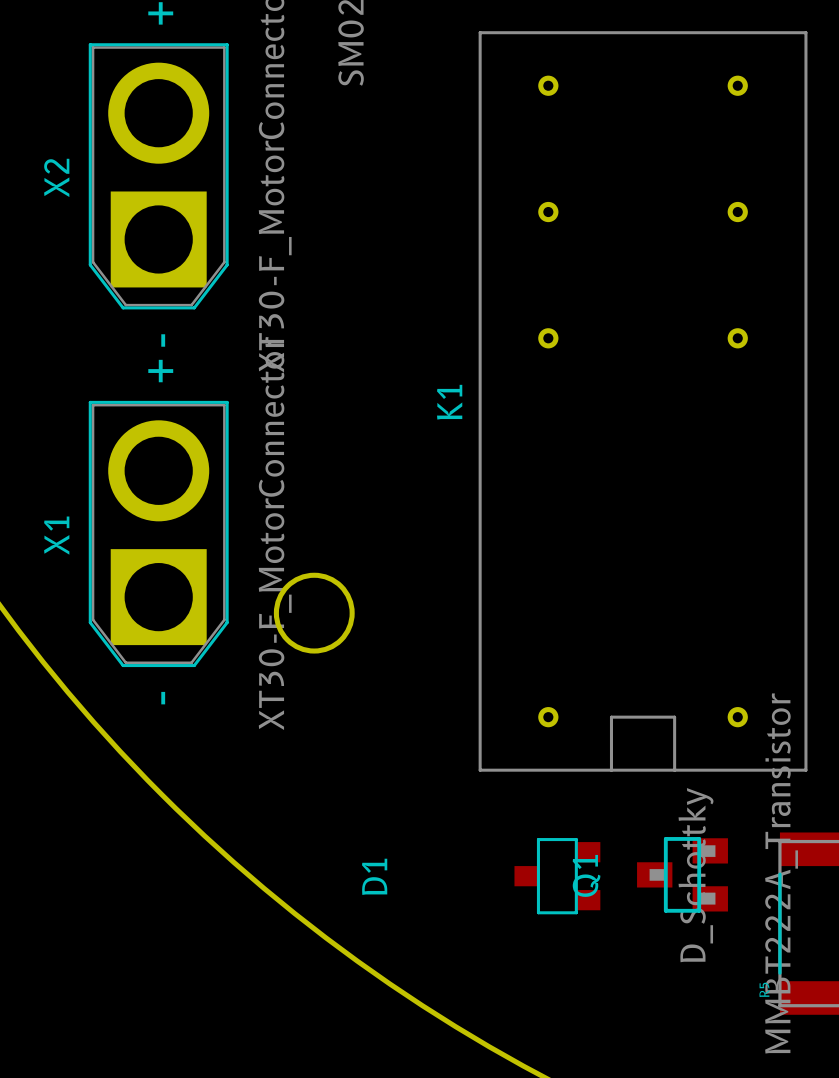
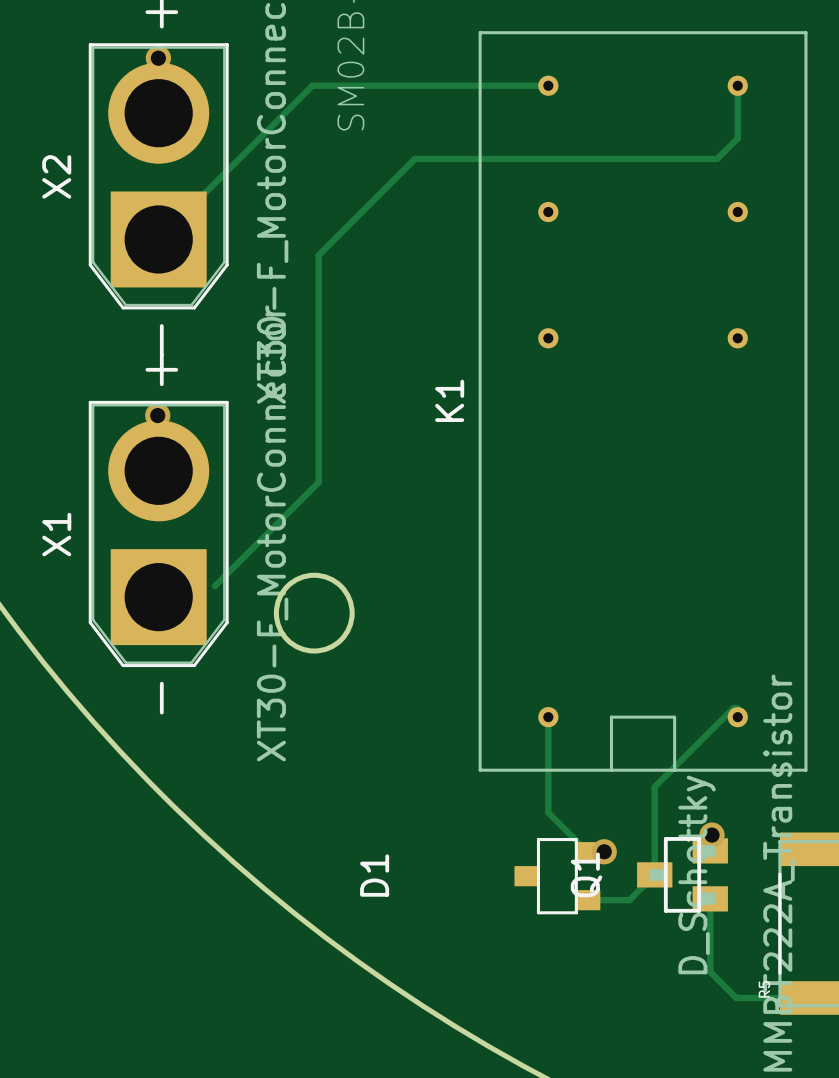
via: none -> (158, 58)
track: none -> (548, 85) (312, 85) (158, 239)
track: none -> (737, 85) (737, 138) (717, 158) (414, 158) (318, 255) (318, 482) (214, 586)
via: none -> (157, 415)
track: none -> (737, 708) (733, 708) (654, 786) (654, 874) (629, 900) (587, 900)
track: none -> (548, 717) (548, 812) (587, 852)
via: none -> (712, 835)
via: none -> (604, 851)
track: none -> (710, 898) (710, 971) (736, 997) (823, 997)

